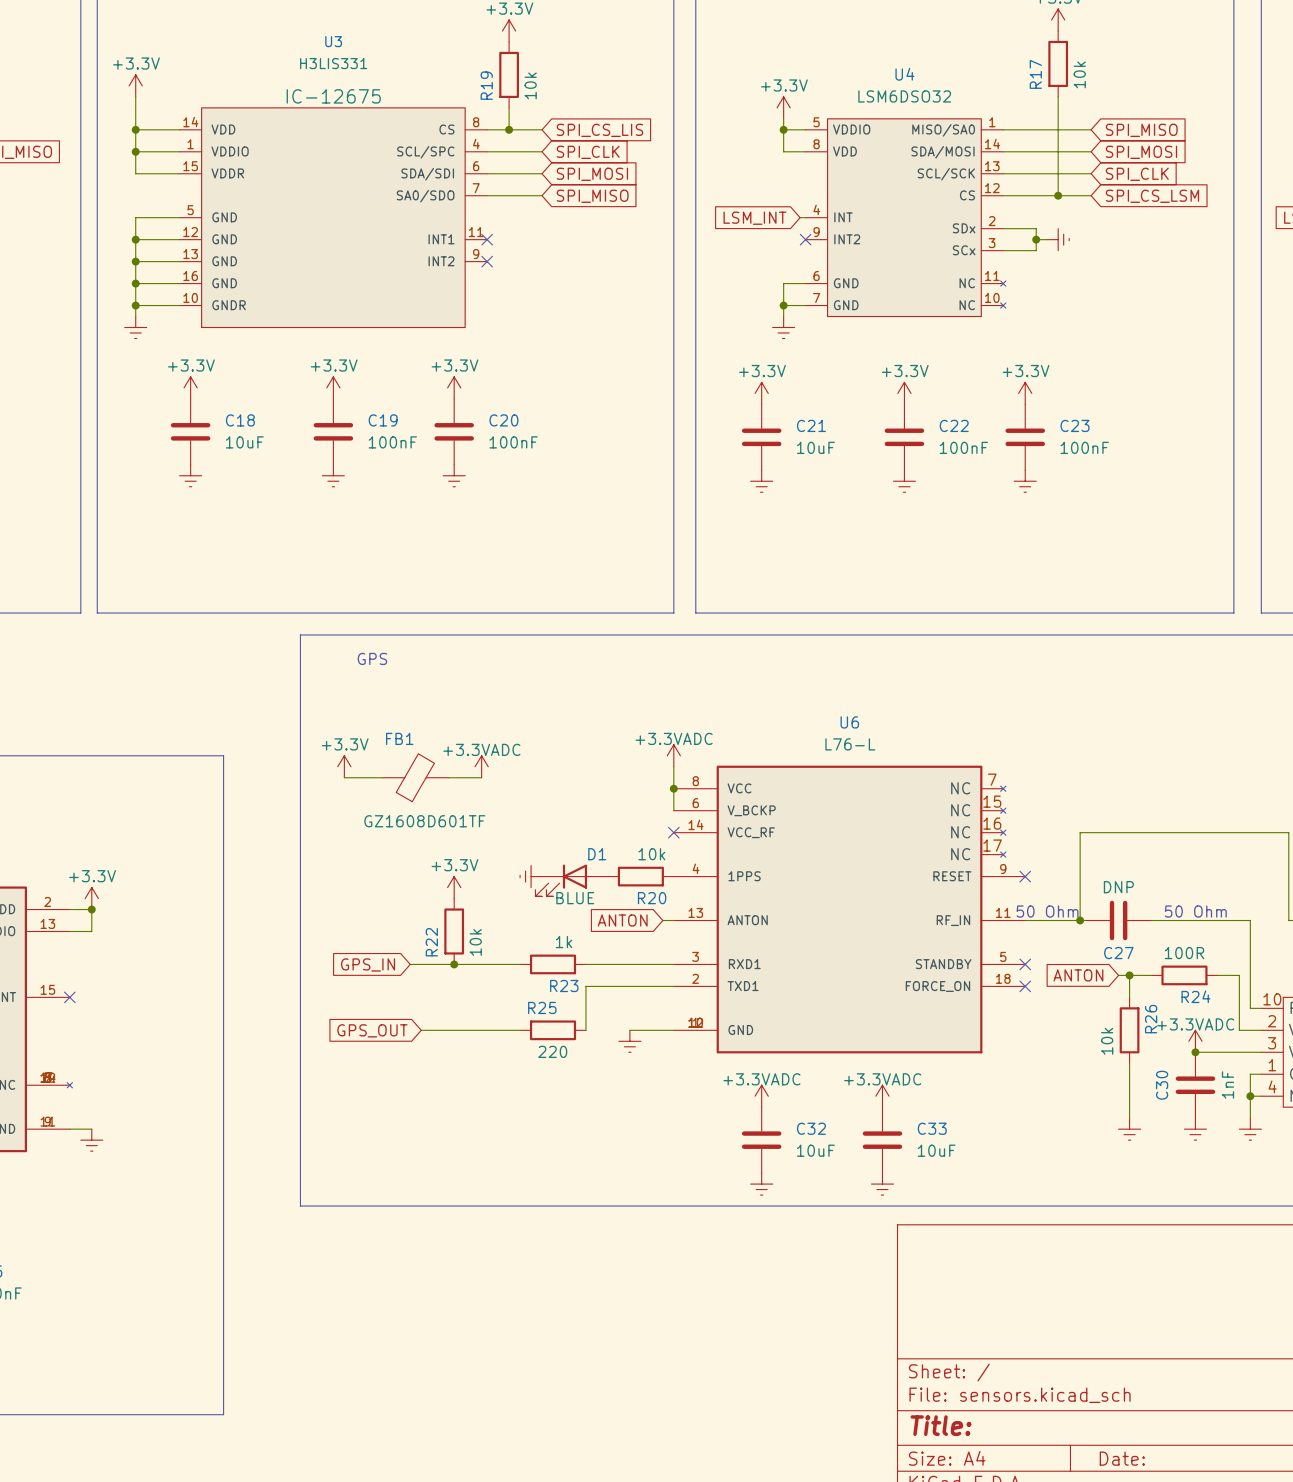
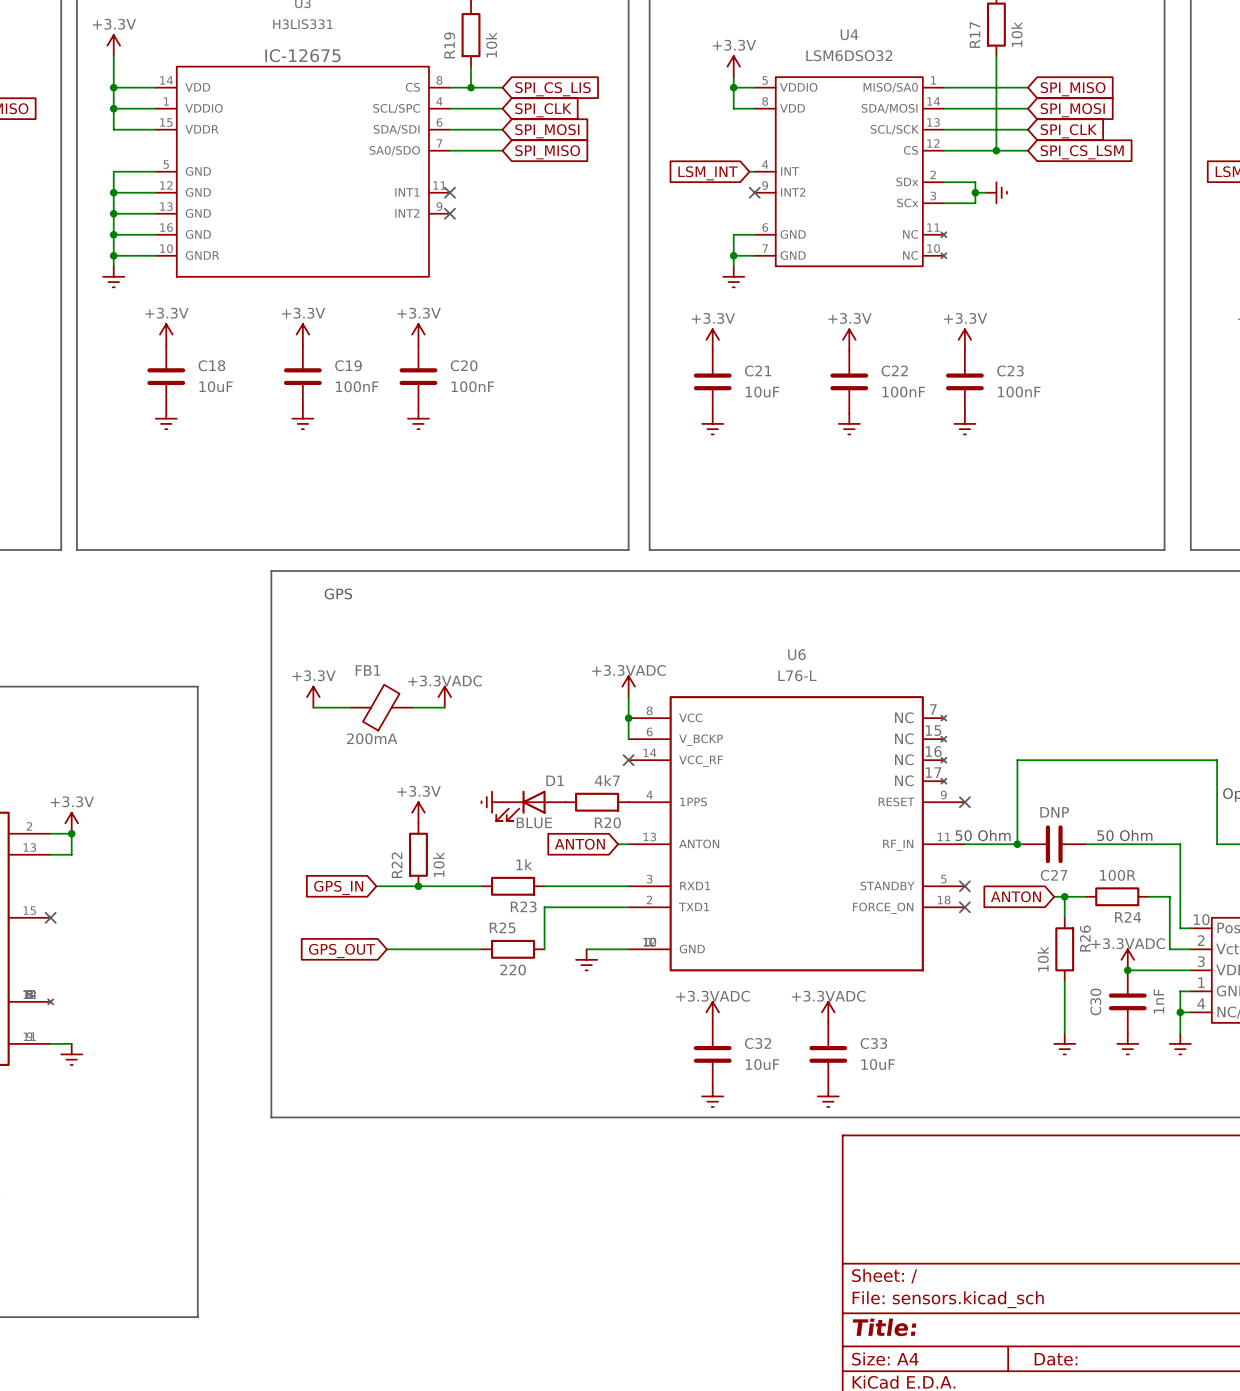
FB1 value: GZ1608D601TF (424, 821) -> 200mA (372, 738)
R20 value: 10k (651, 854) -> 4k7 (607, 780)

